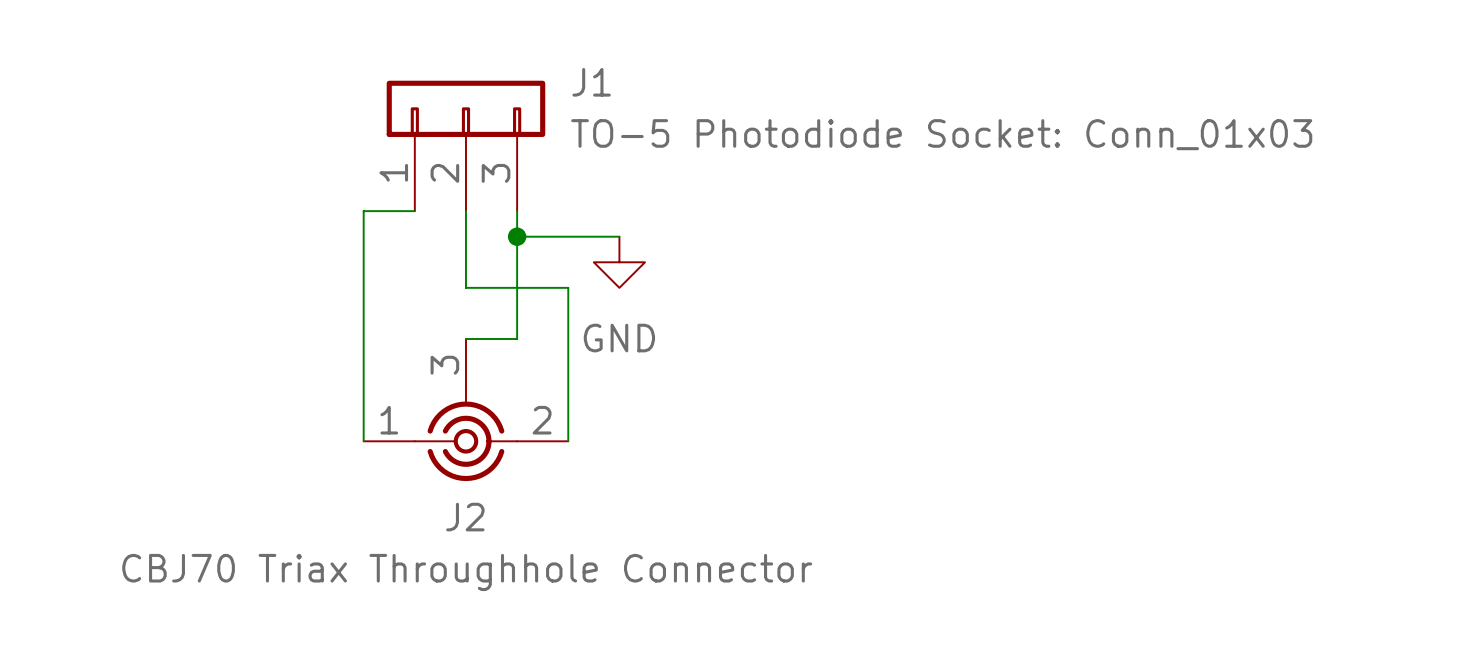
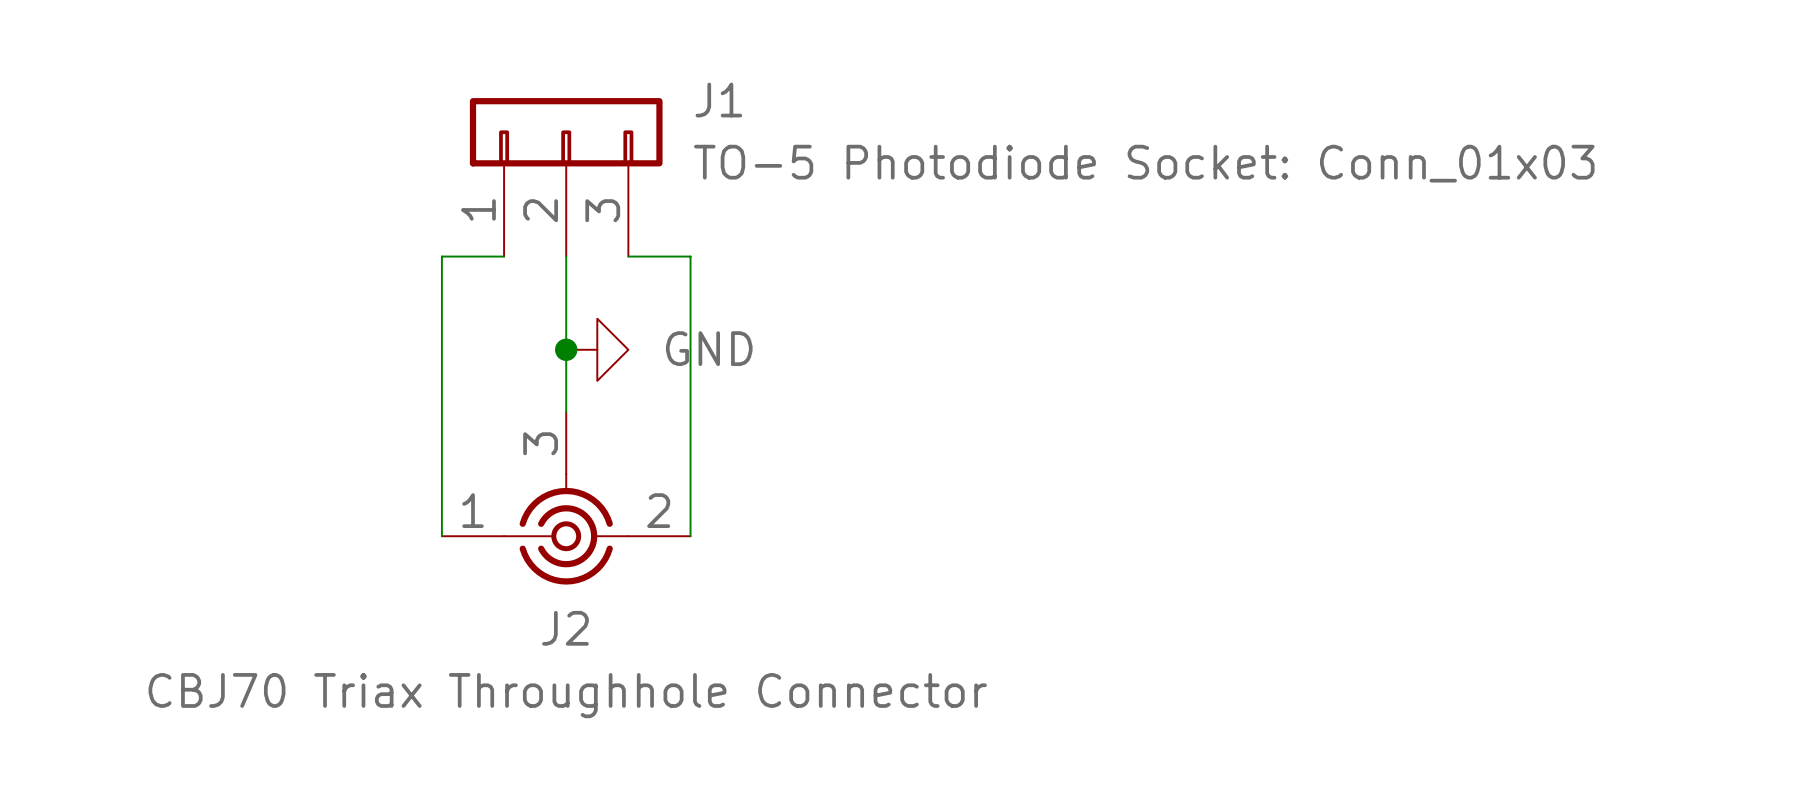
wire: (517, 211) (517, 339) (465, 339) -> (566, 349) (566, 411)
wire: (517, 236) (619, 236) -> none
junction position: (517, 236) -> (566, 349)
power symbol rotation: 0° (619, 262) -> 90° counterclockwise (597, 349)
power symbol position: GND (619, 262) -> GND (597, 349)
wire: (465, 287) (568, 287) -> (628, 256) (690, 256) (690, 349)

